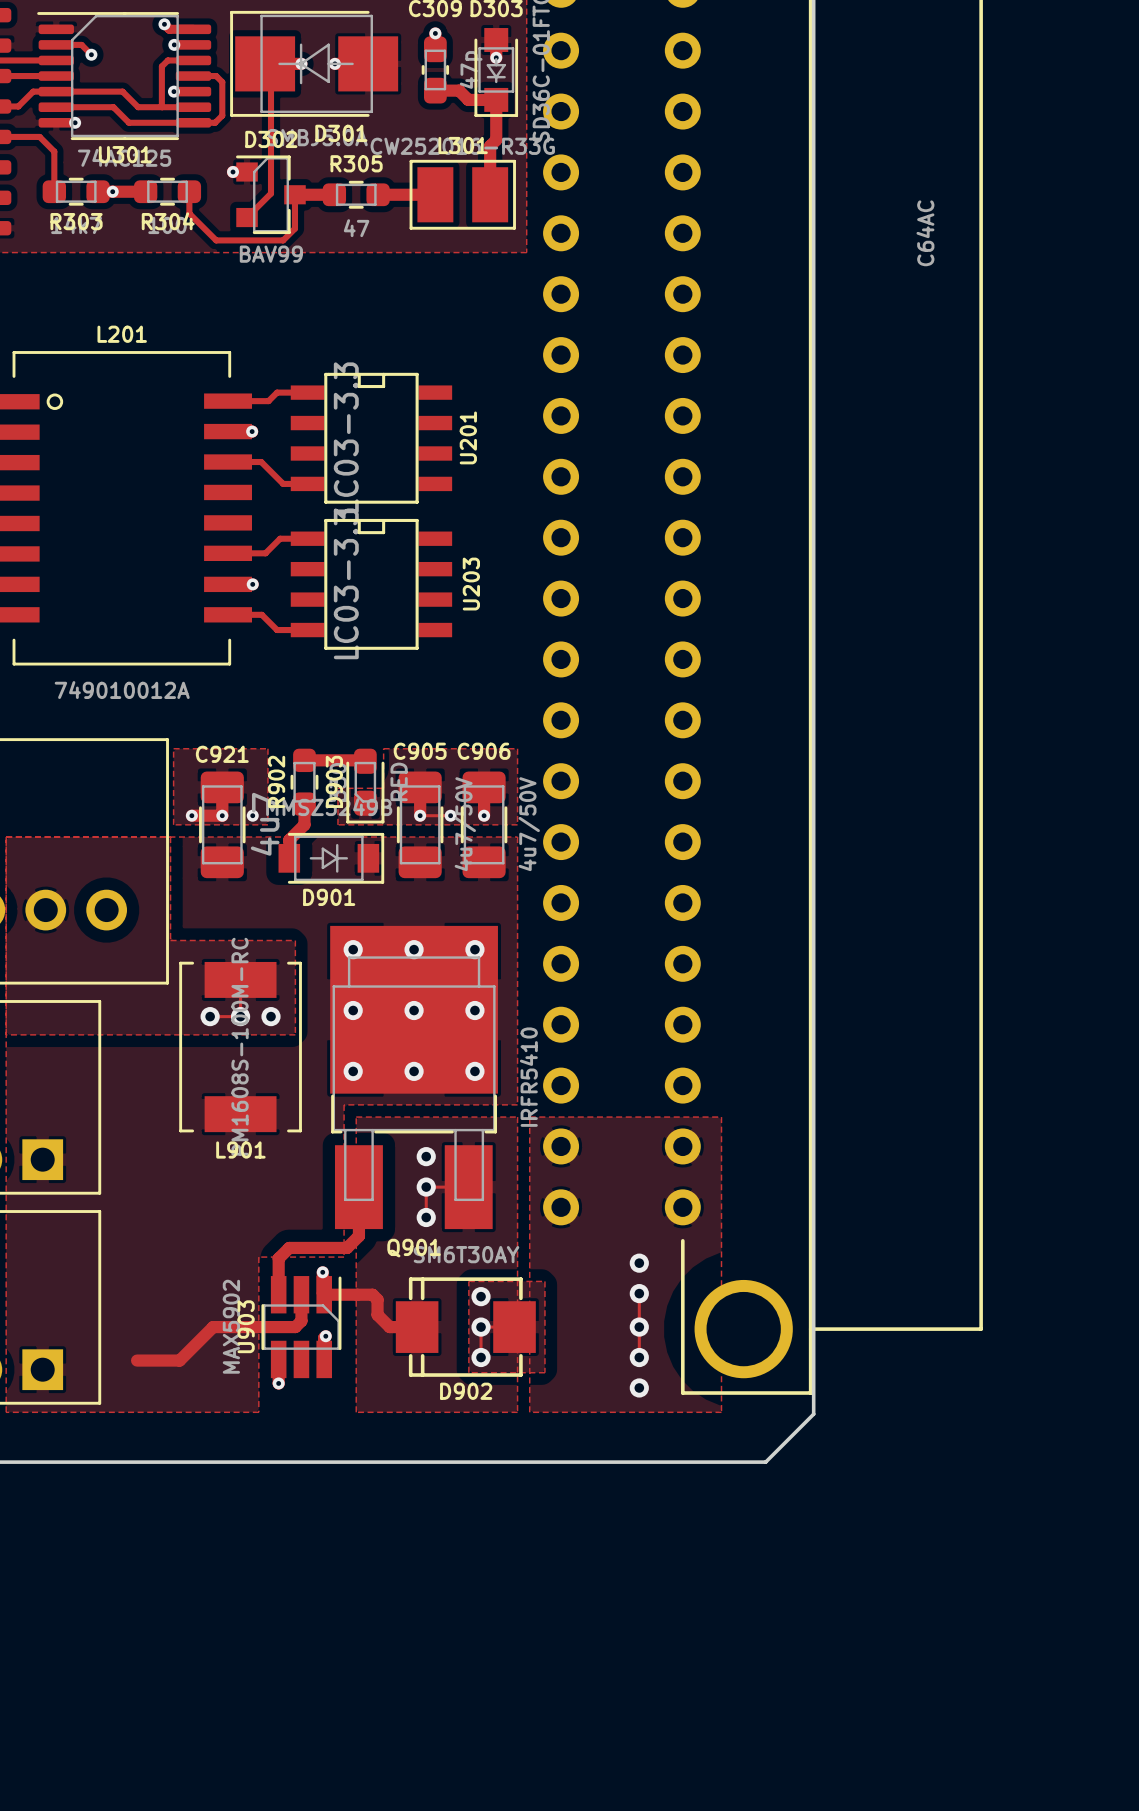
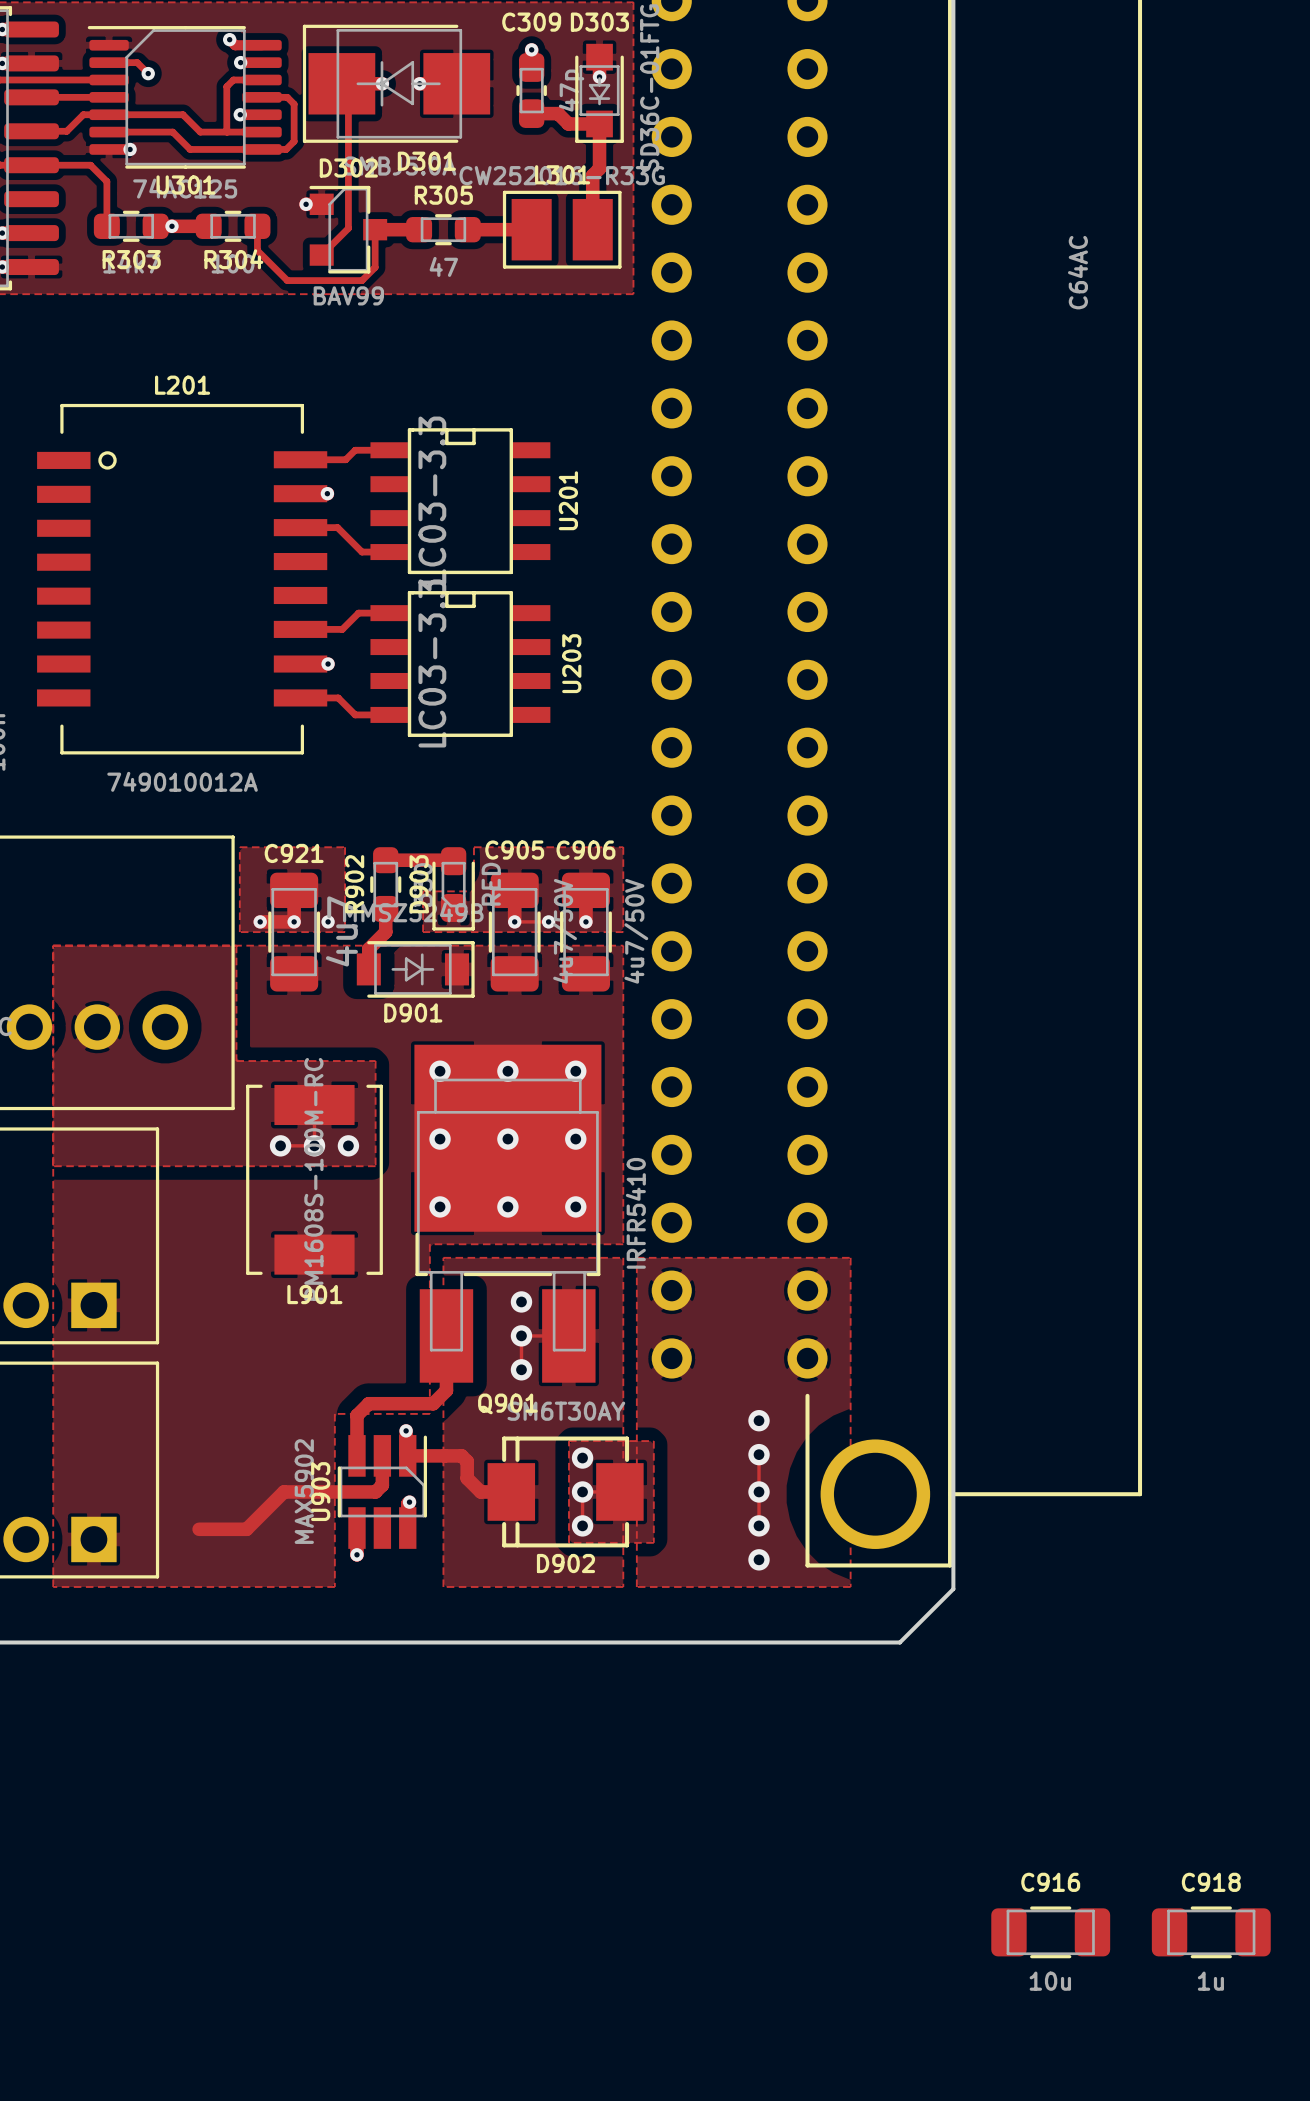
C916: none -> 10u (1050, 1932)
C918: none -> 1u (1211, 1932)

